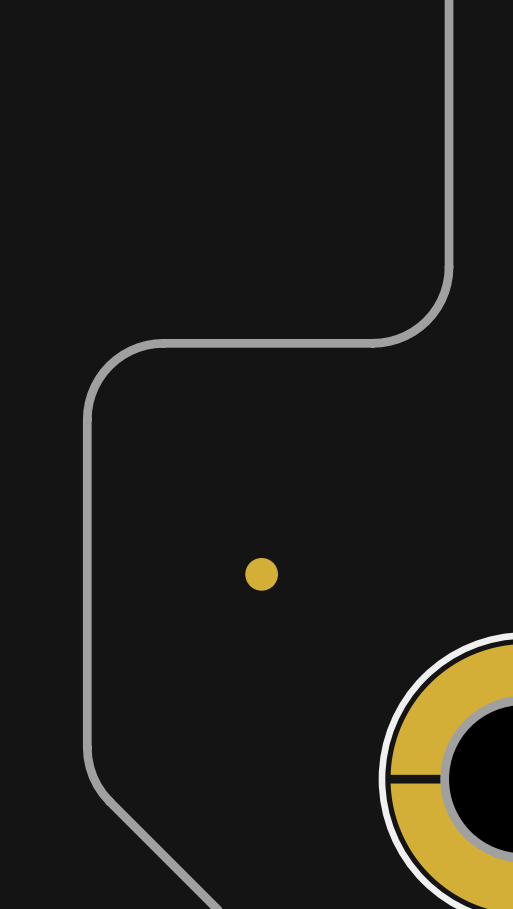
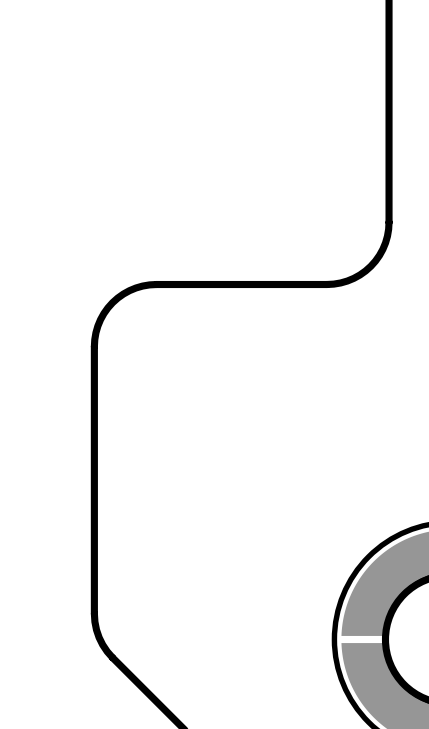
part: (261, 574) -> none

